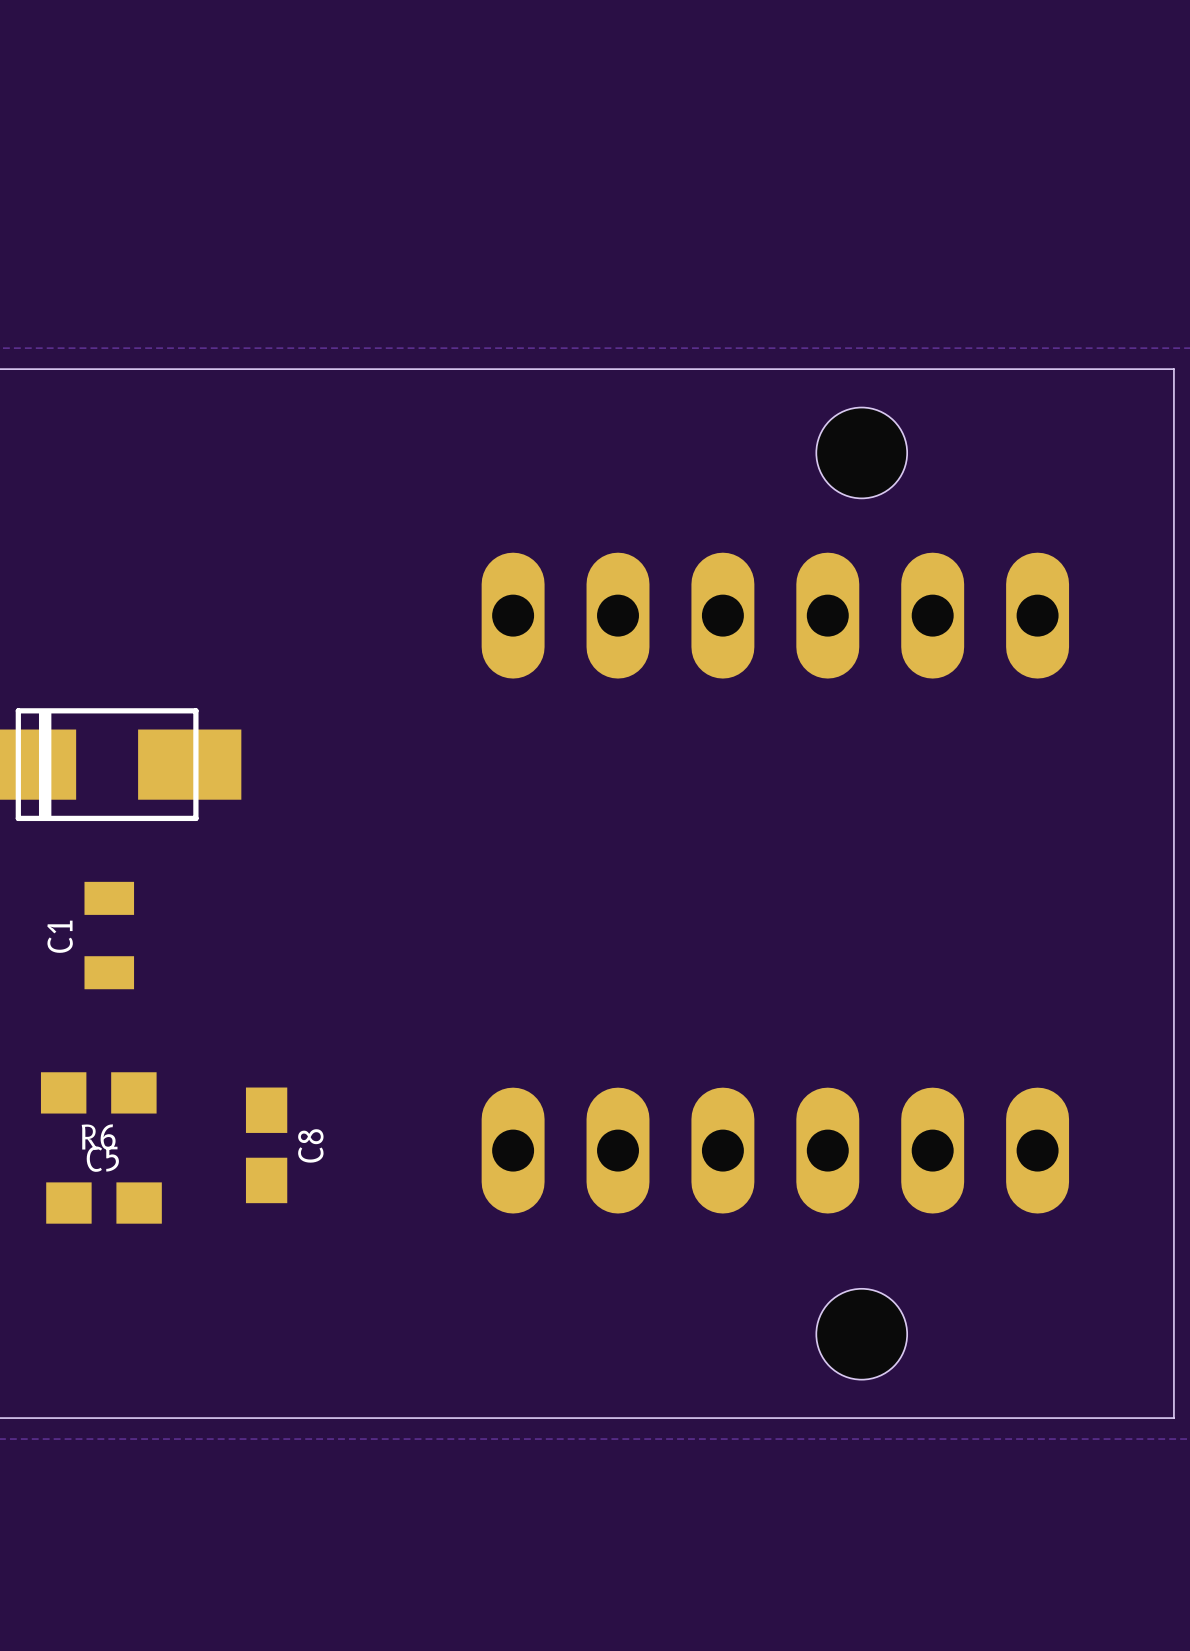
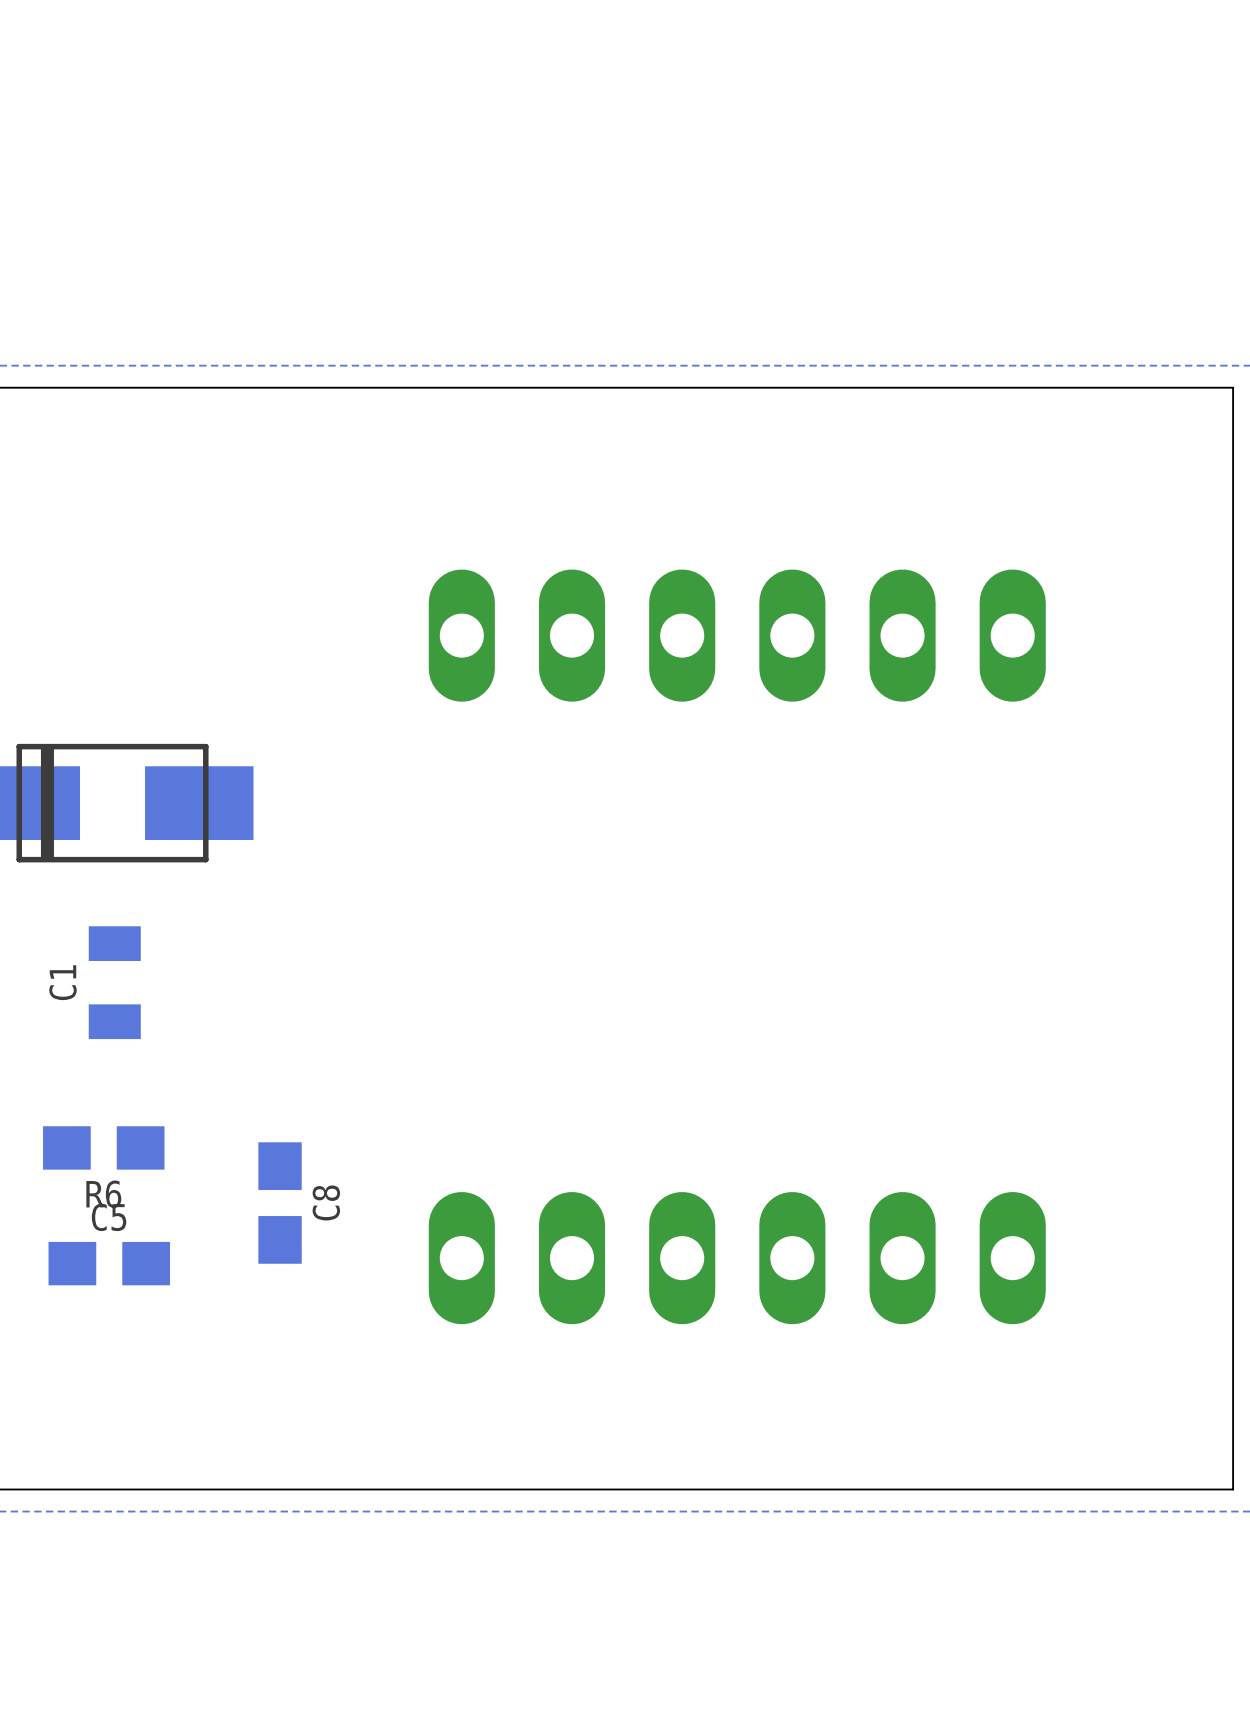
hole: (861, 452) -> none
part position: (775, 615) -> (737, 635)
part position: (775, 1150) -> (737, 1258)
hole: (861, 1334) -> none

